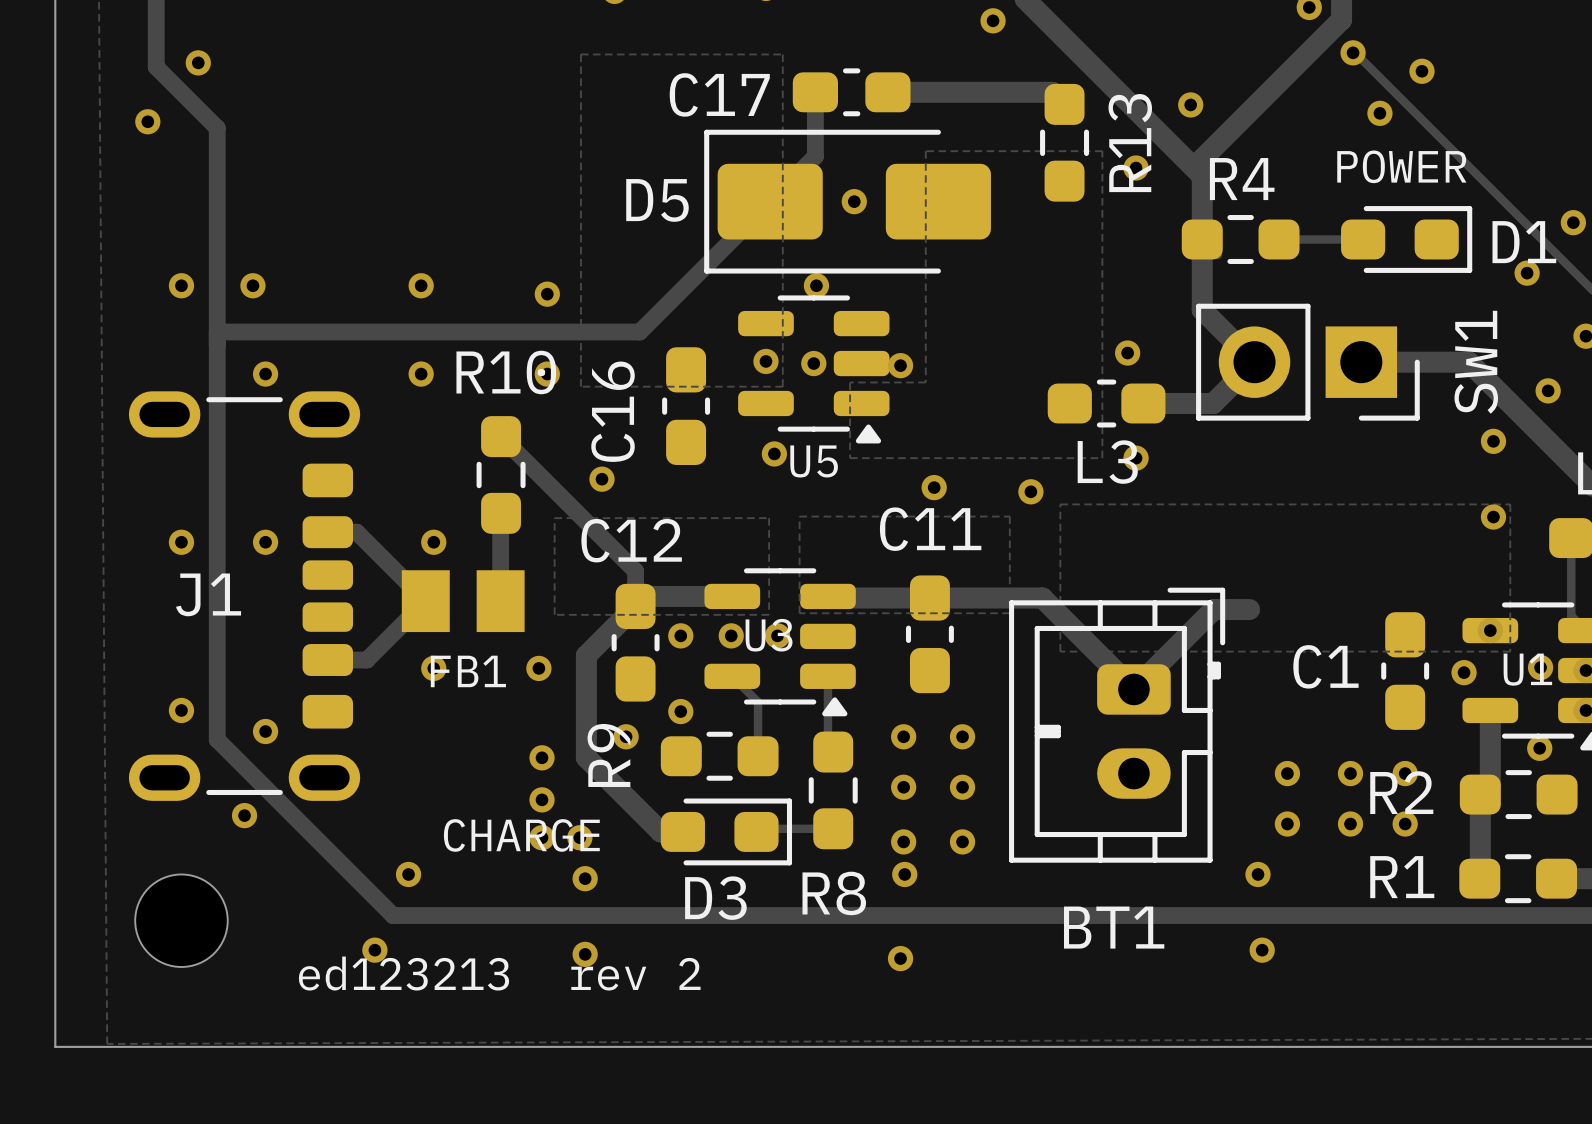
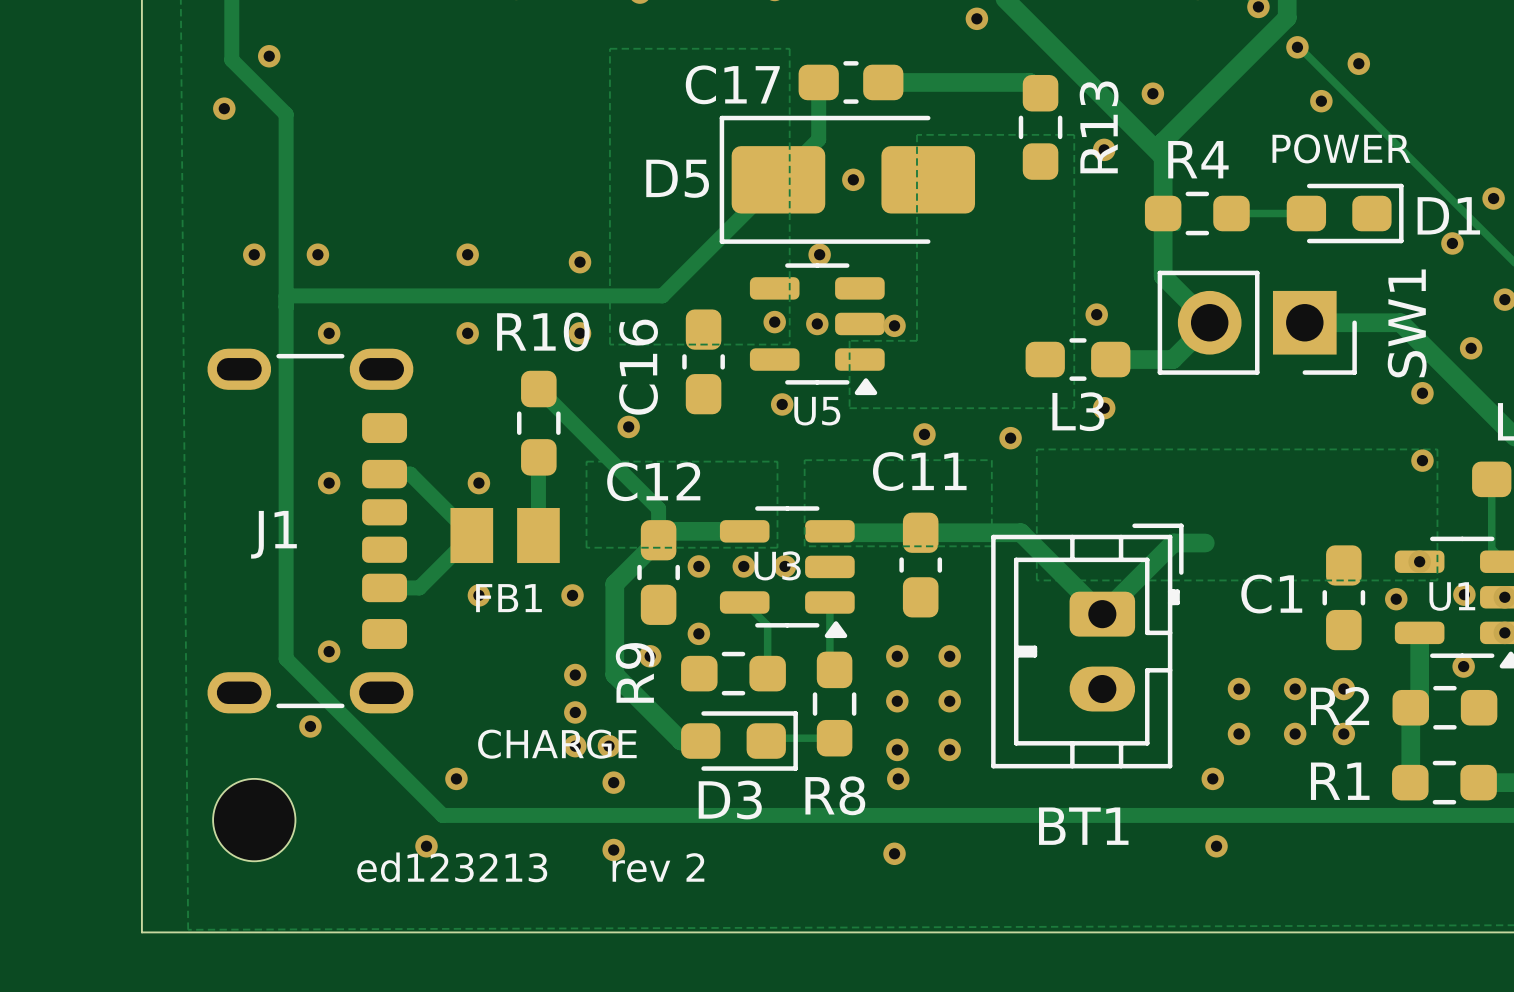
via: (181, 542) -> none
via: (181, 710) -> none

